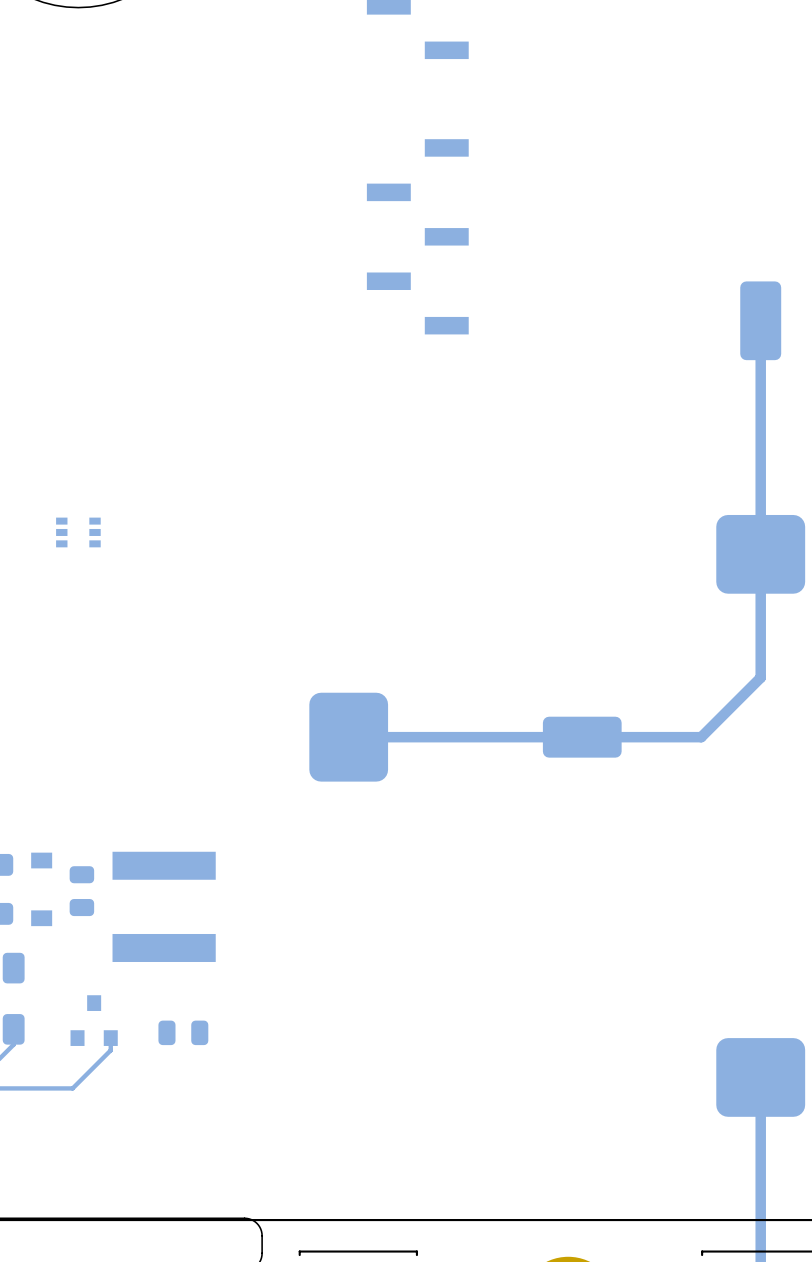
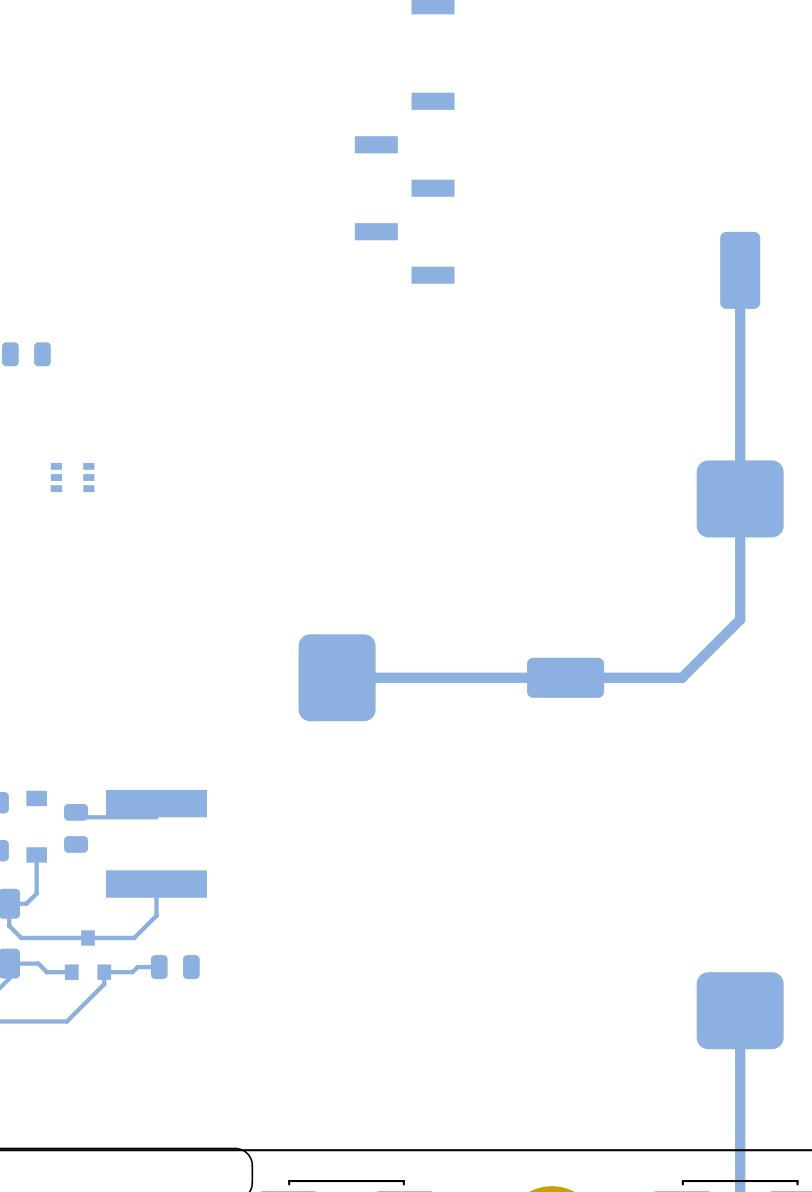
part: none -> (26, 354)
bottom track: none -> (76, 812) (80, 817) (156, 817)
bottom track: none -> (36, 854) (36, 893) (26, 903) (9, 903) (9, 925) (21, 937) (134, 937) (156, 915) (156, 897)
bottom track: none -> (9, 963) (38, 963) (46, 972) (71, 972)
bottom track: none -> (159, 967) (137, 967) (132, 972) (104, 972)

